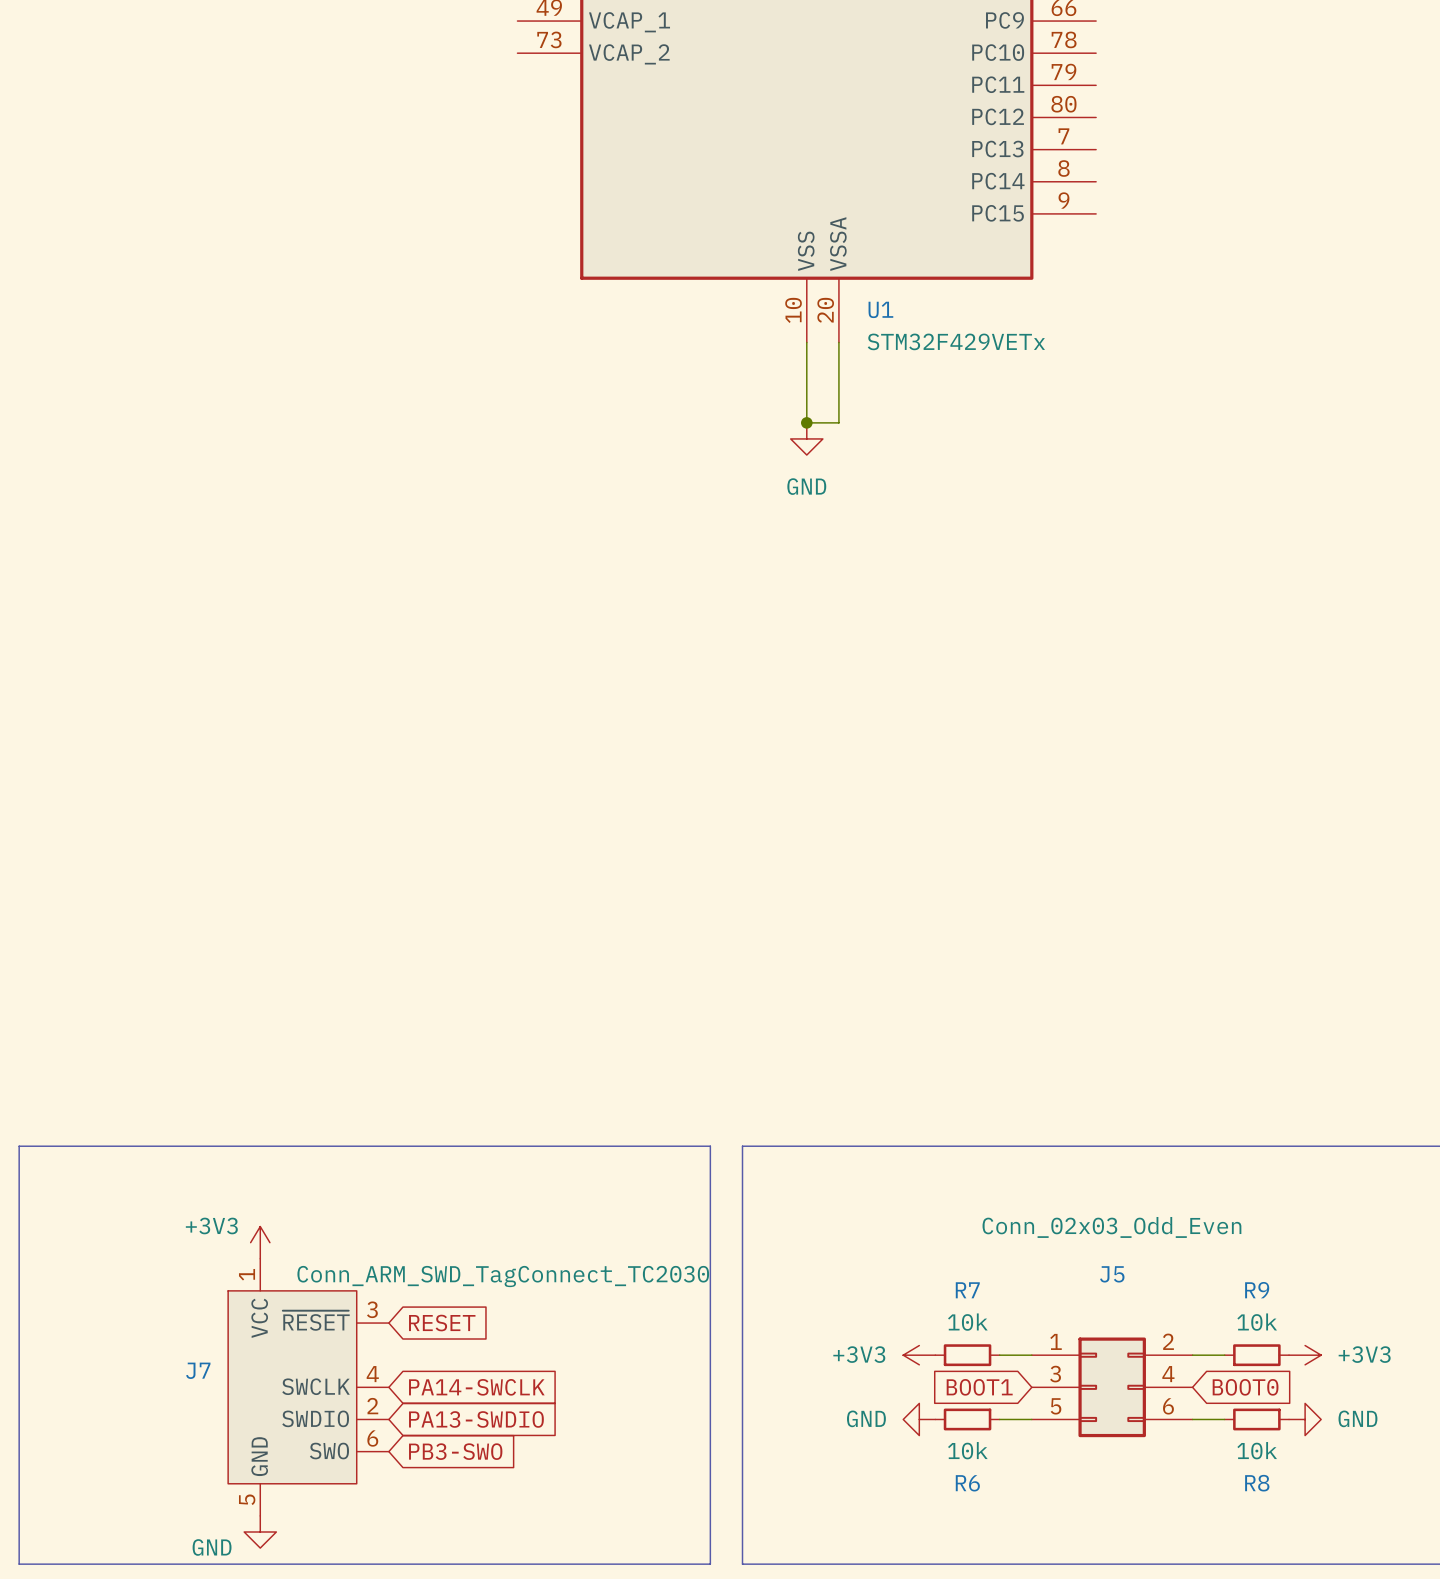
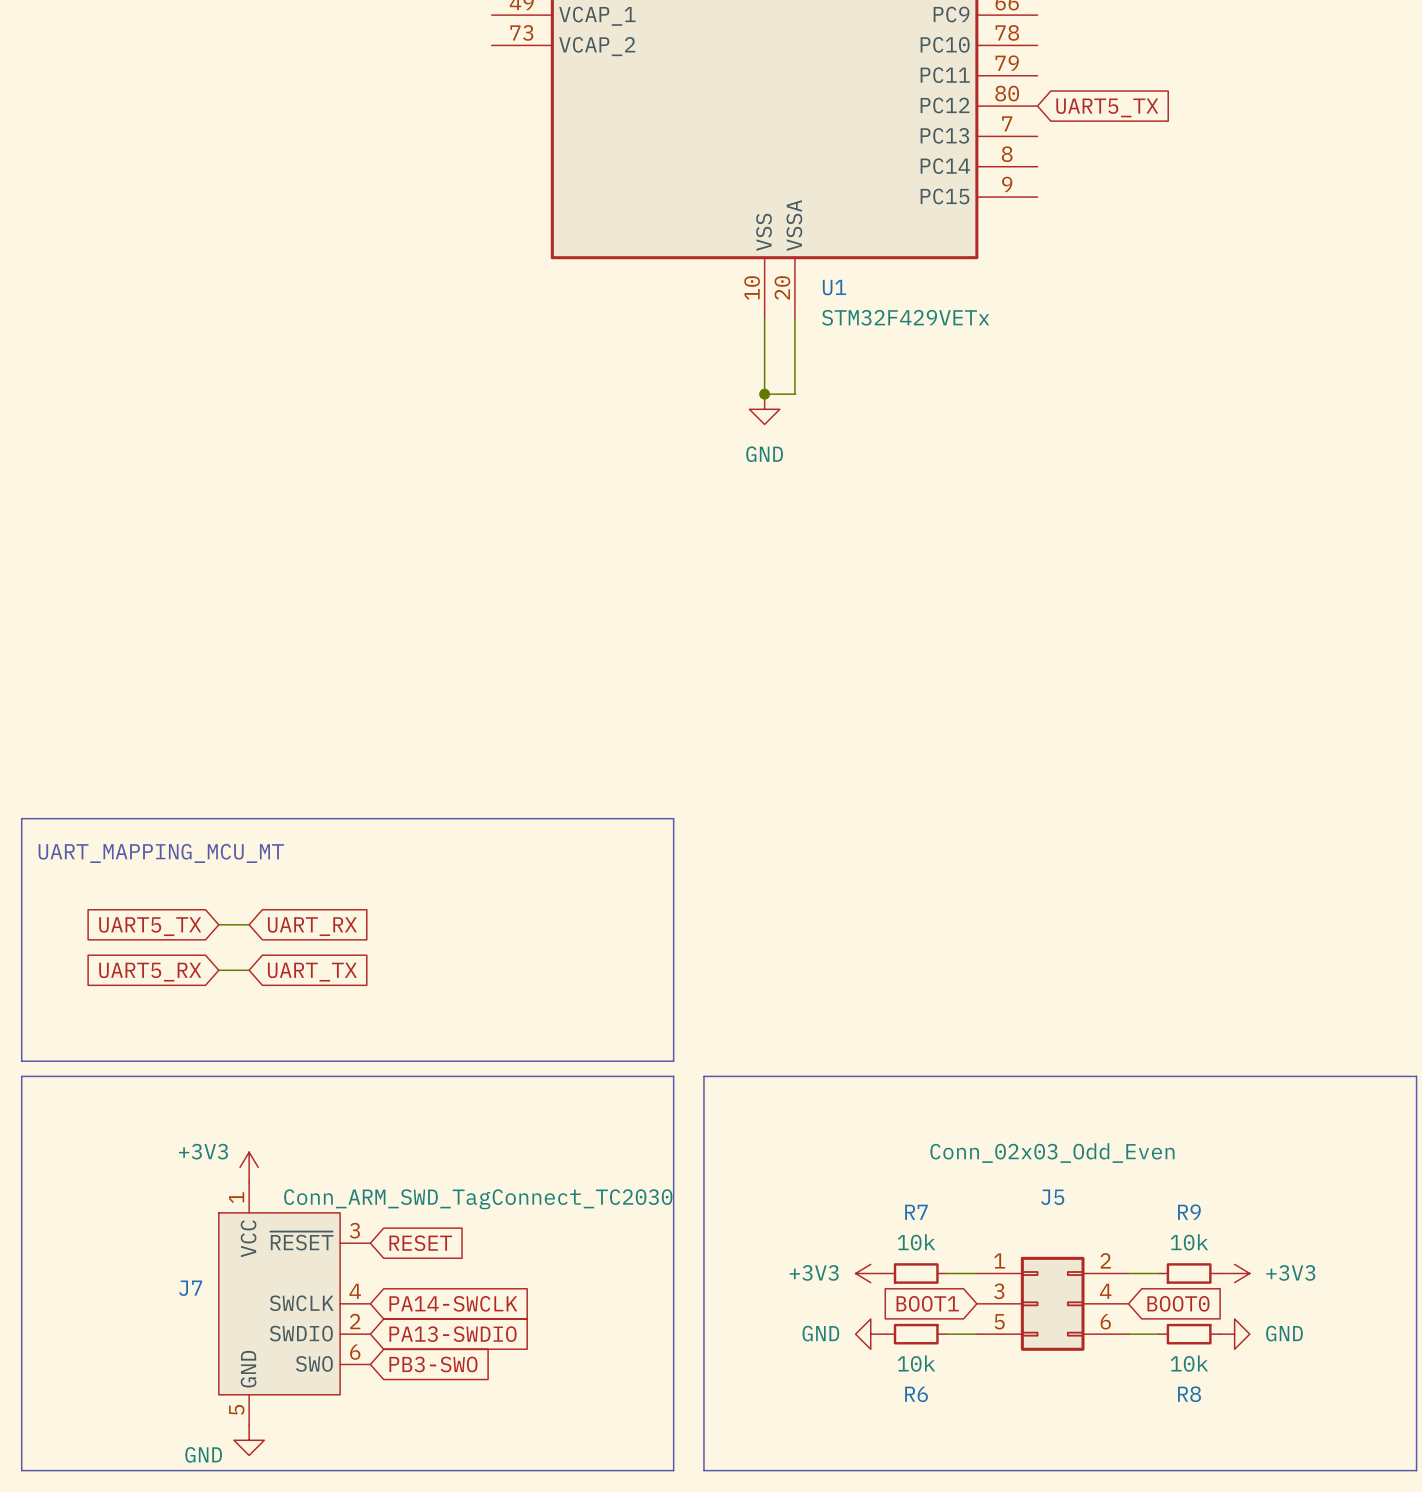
global label: none -> UART5_TX (1107, 107)
line: none -> (21, 818) (673, 818) (673, 1061) (21, 1061) (21, 818)
text: none -> UART_MAPPING_MCU_MT (161, 853)
wire: none -> (218, 924) (249, 924)
global label: none -> UART5_TX (150, 926)
global label: none -> UART_RX (312, 926)
wire: none -> (218, 970) (249, 970)
global label: none -> UART5_RX (150, 972)
global label: none -> UART_TX (312, 972)

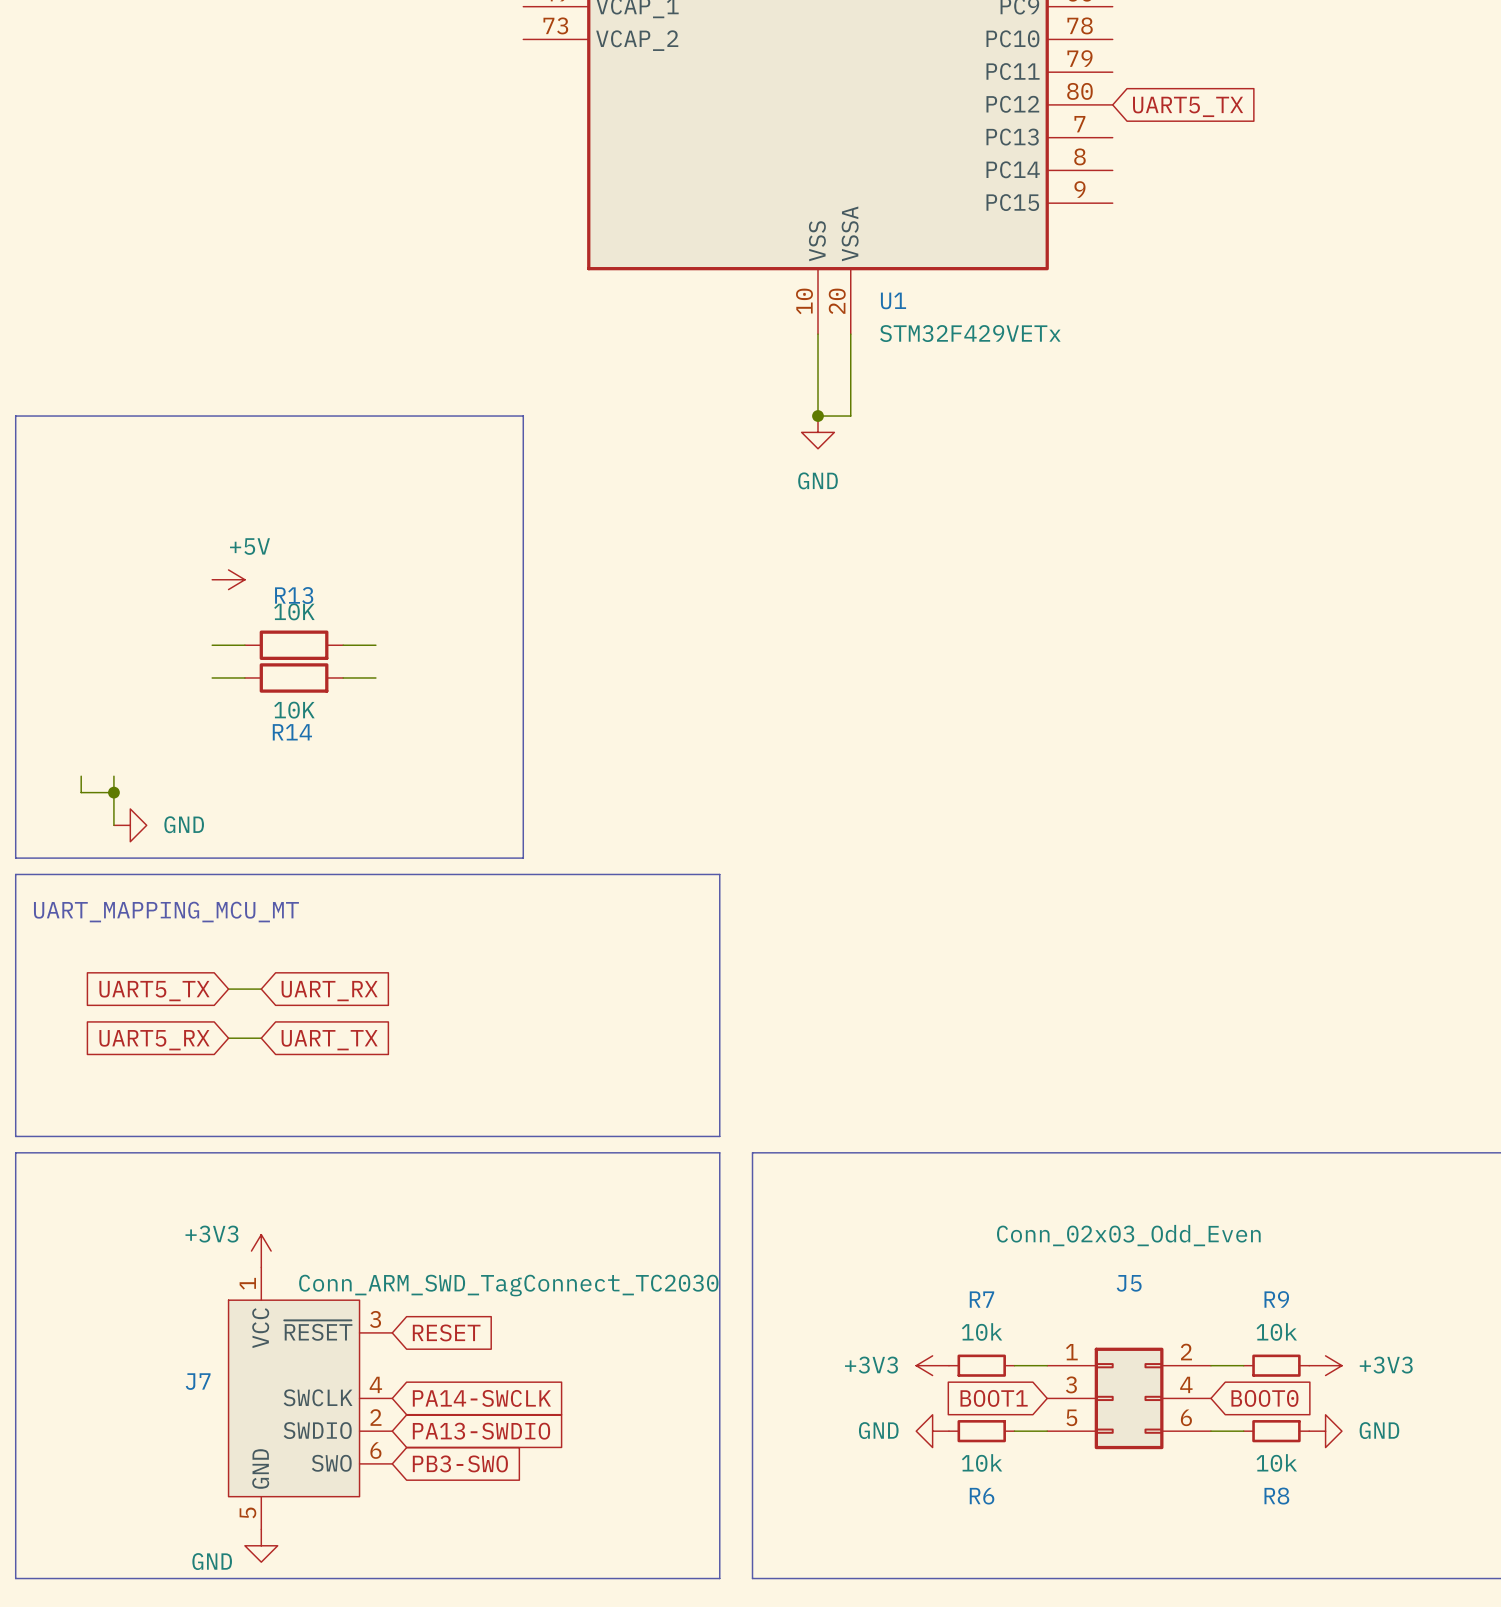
line: none -> (15, 416) (523, 416) (523, 858) (15, 858) (15, 416)
power symbol: none -> +5V (228, 579)
wire: none -> (212, 645) (244, 645)
R13: none -> 10K (294, 645)
wire: none -> (343, 645) (375, 645)
wire: none -> (212, 677) (244, 677)
R14: none -> 10K (294, 677)
wire: none -> (343, 677) (375, 677)
wire: none -> (81, 776) (81, 792) (113, 792)
wire: none -> (113, 776) (113, 825)
junction: none -> (113, 792)
power symbol: none -> GND (130, 825)

